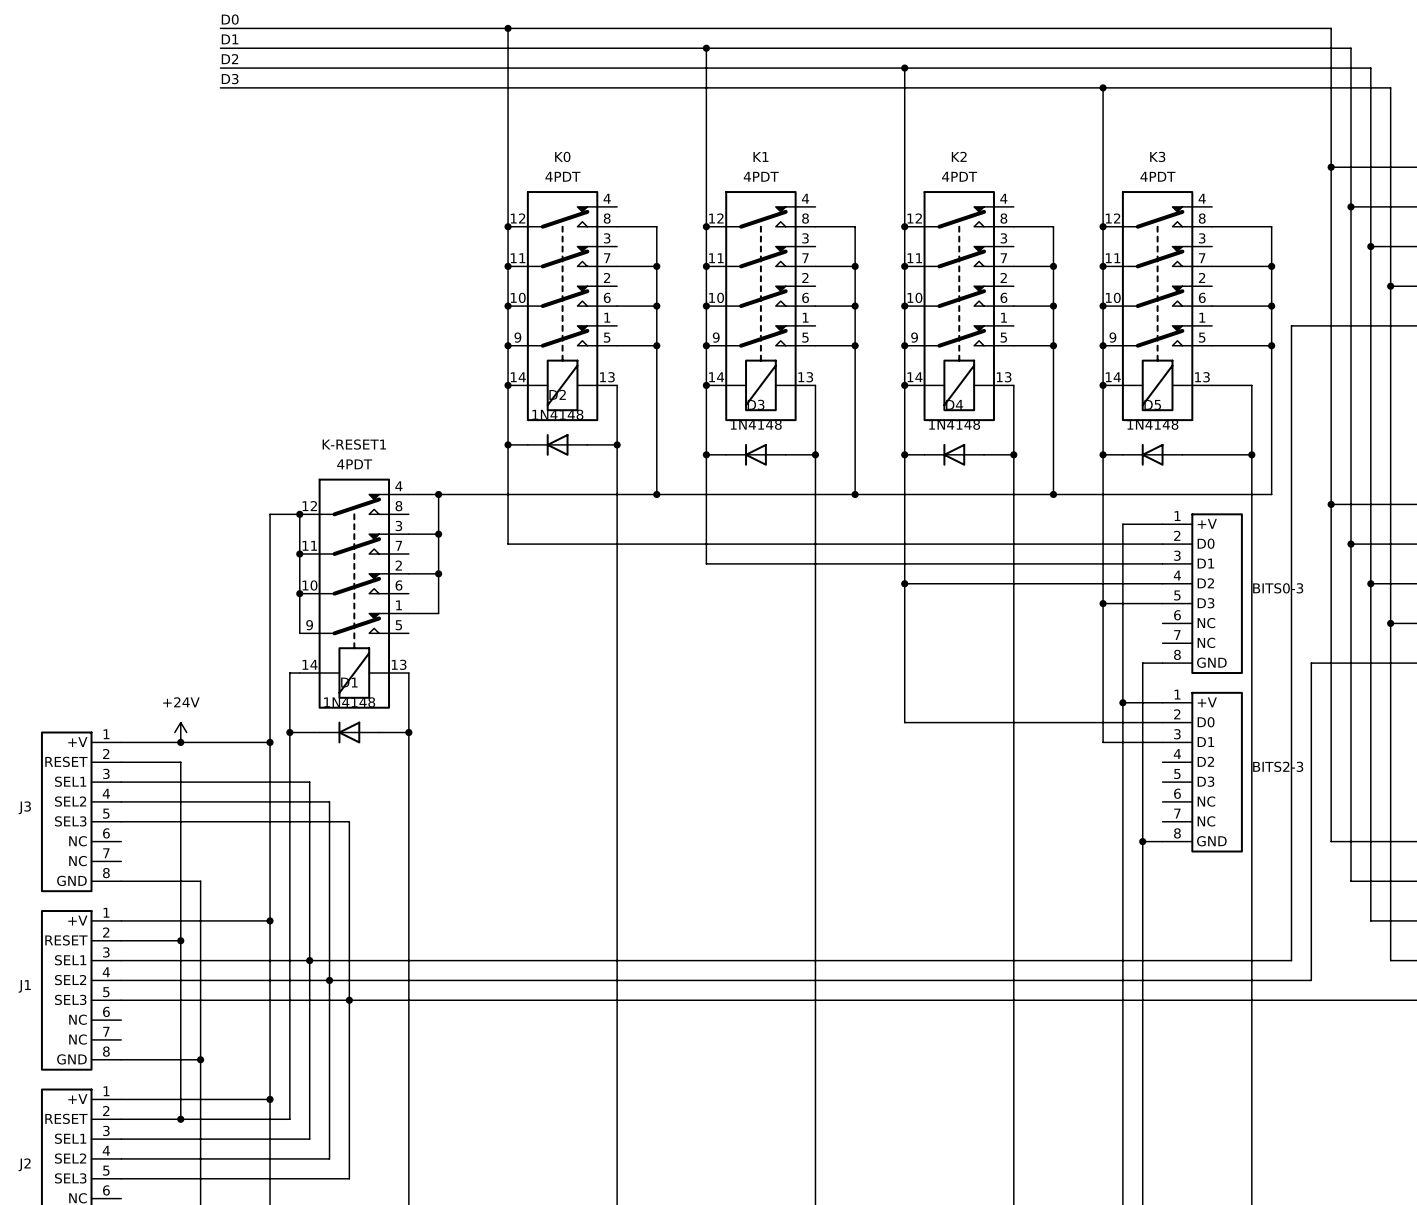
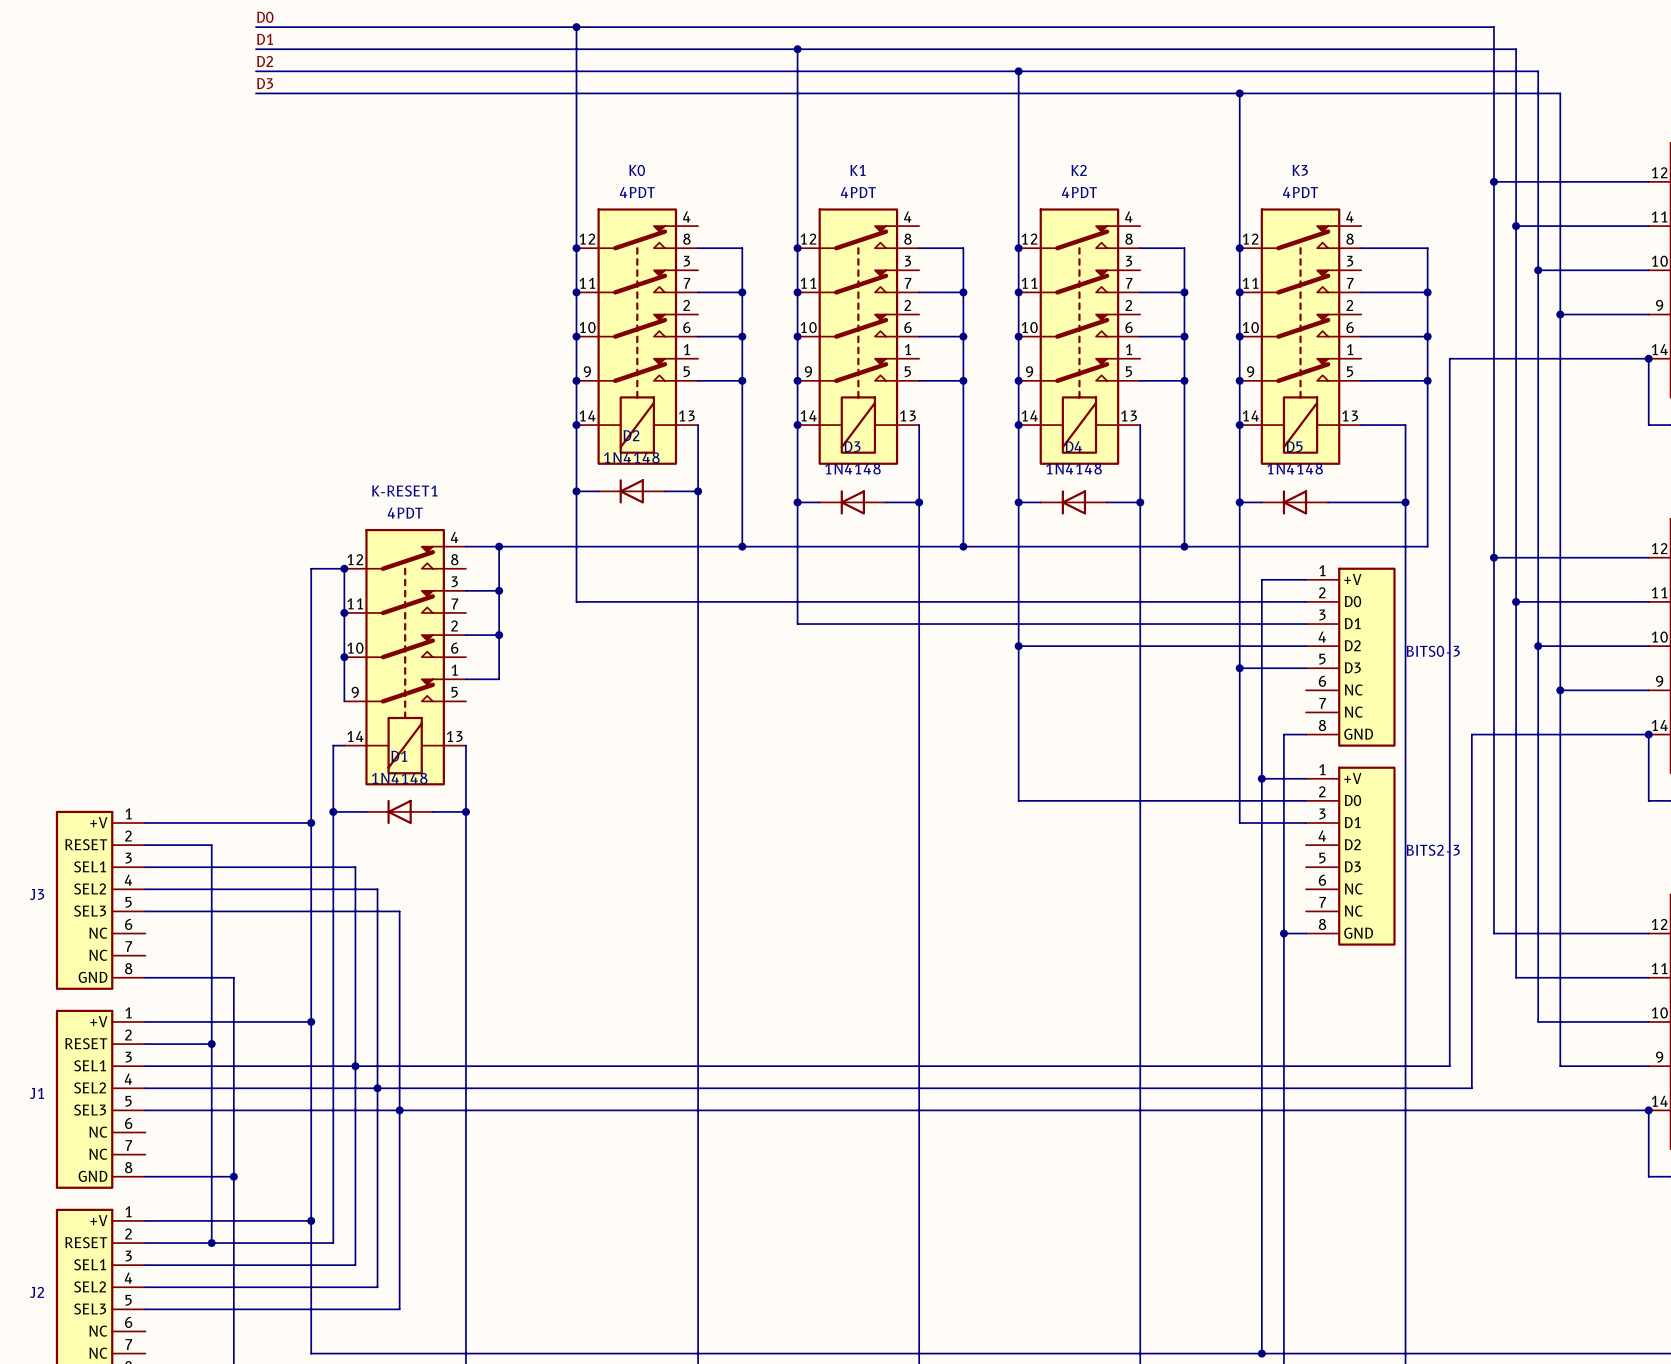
power symbol: +24V (180, 732) -> none
junction: (180, 742) -> none

